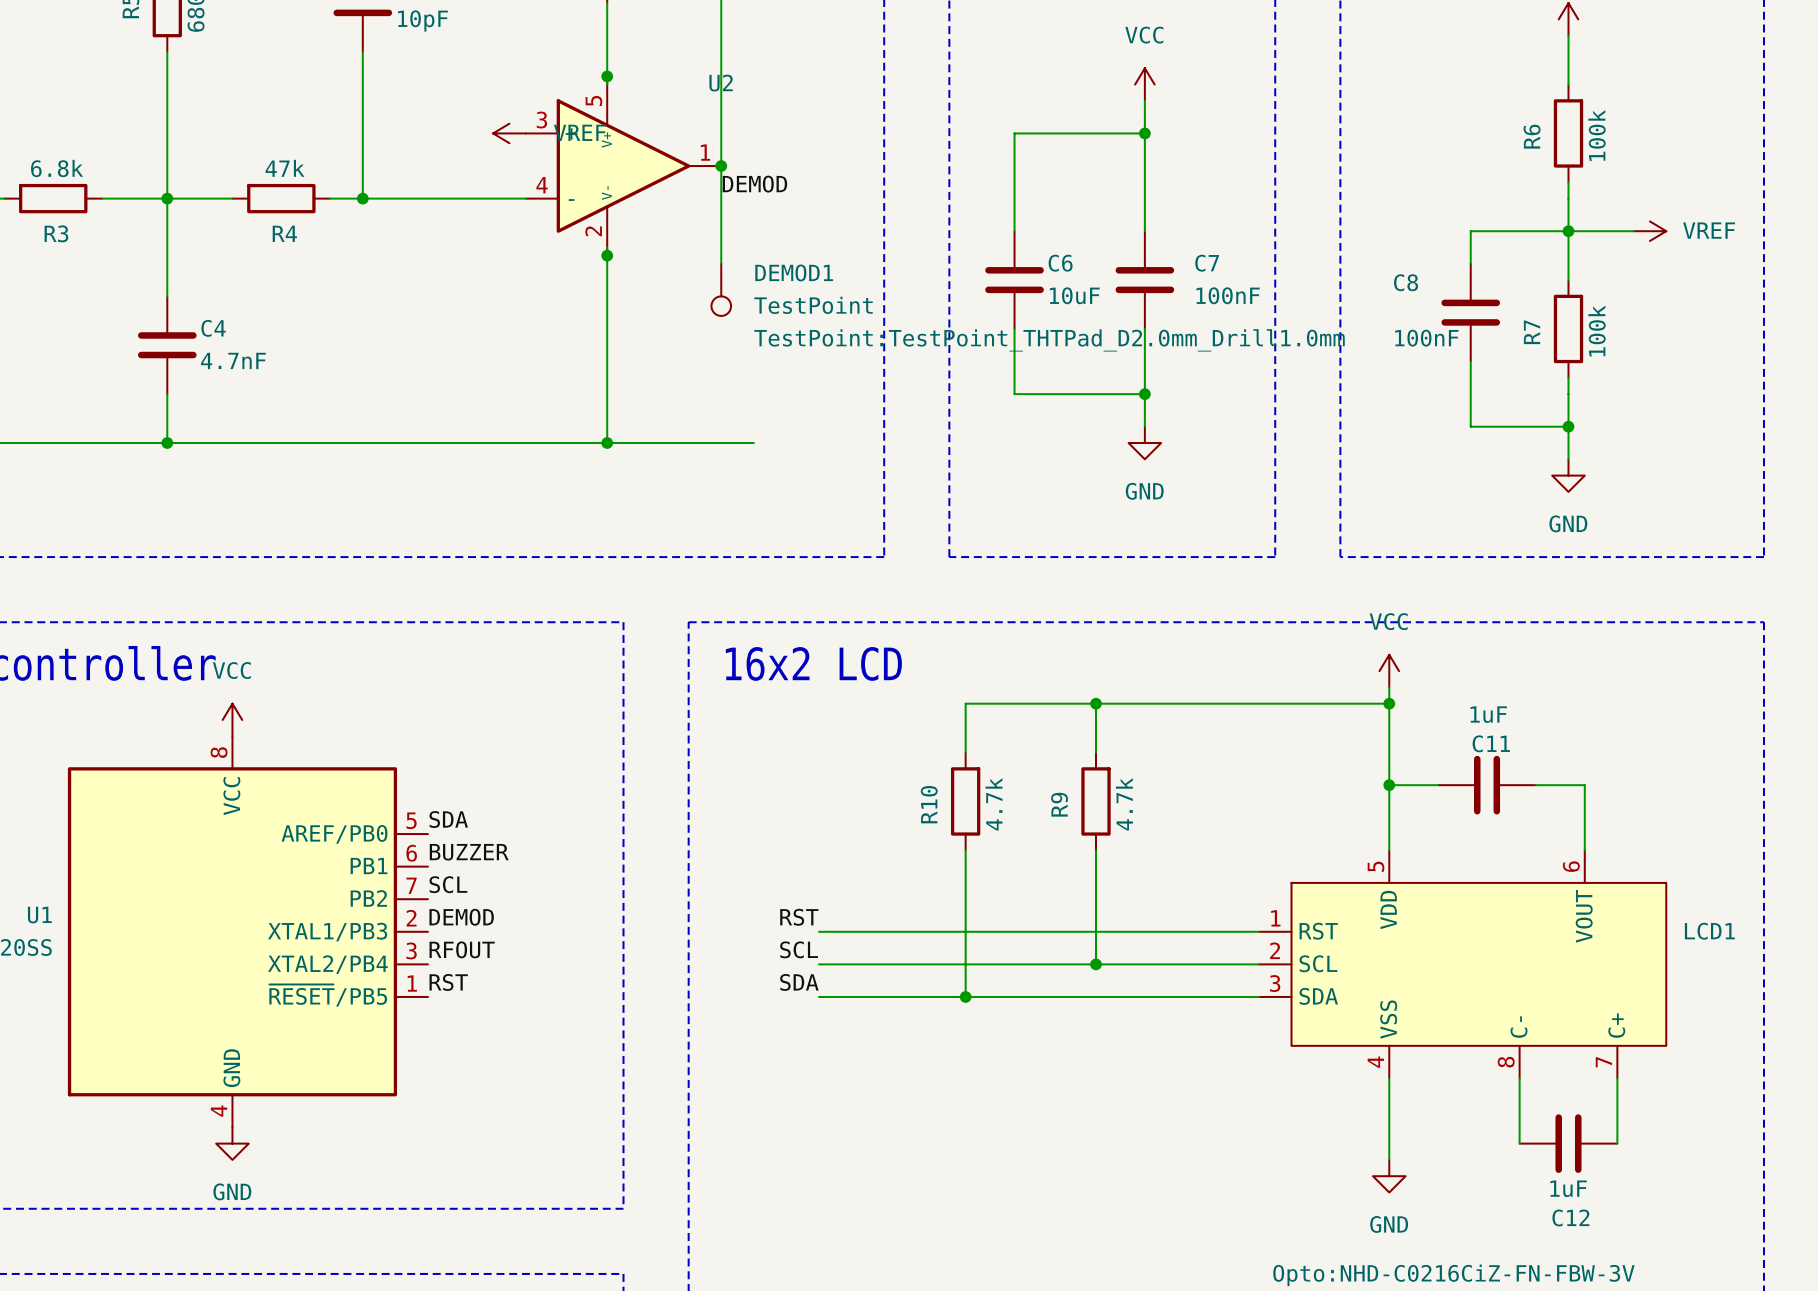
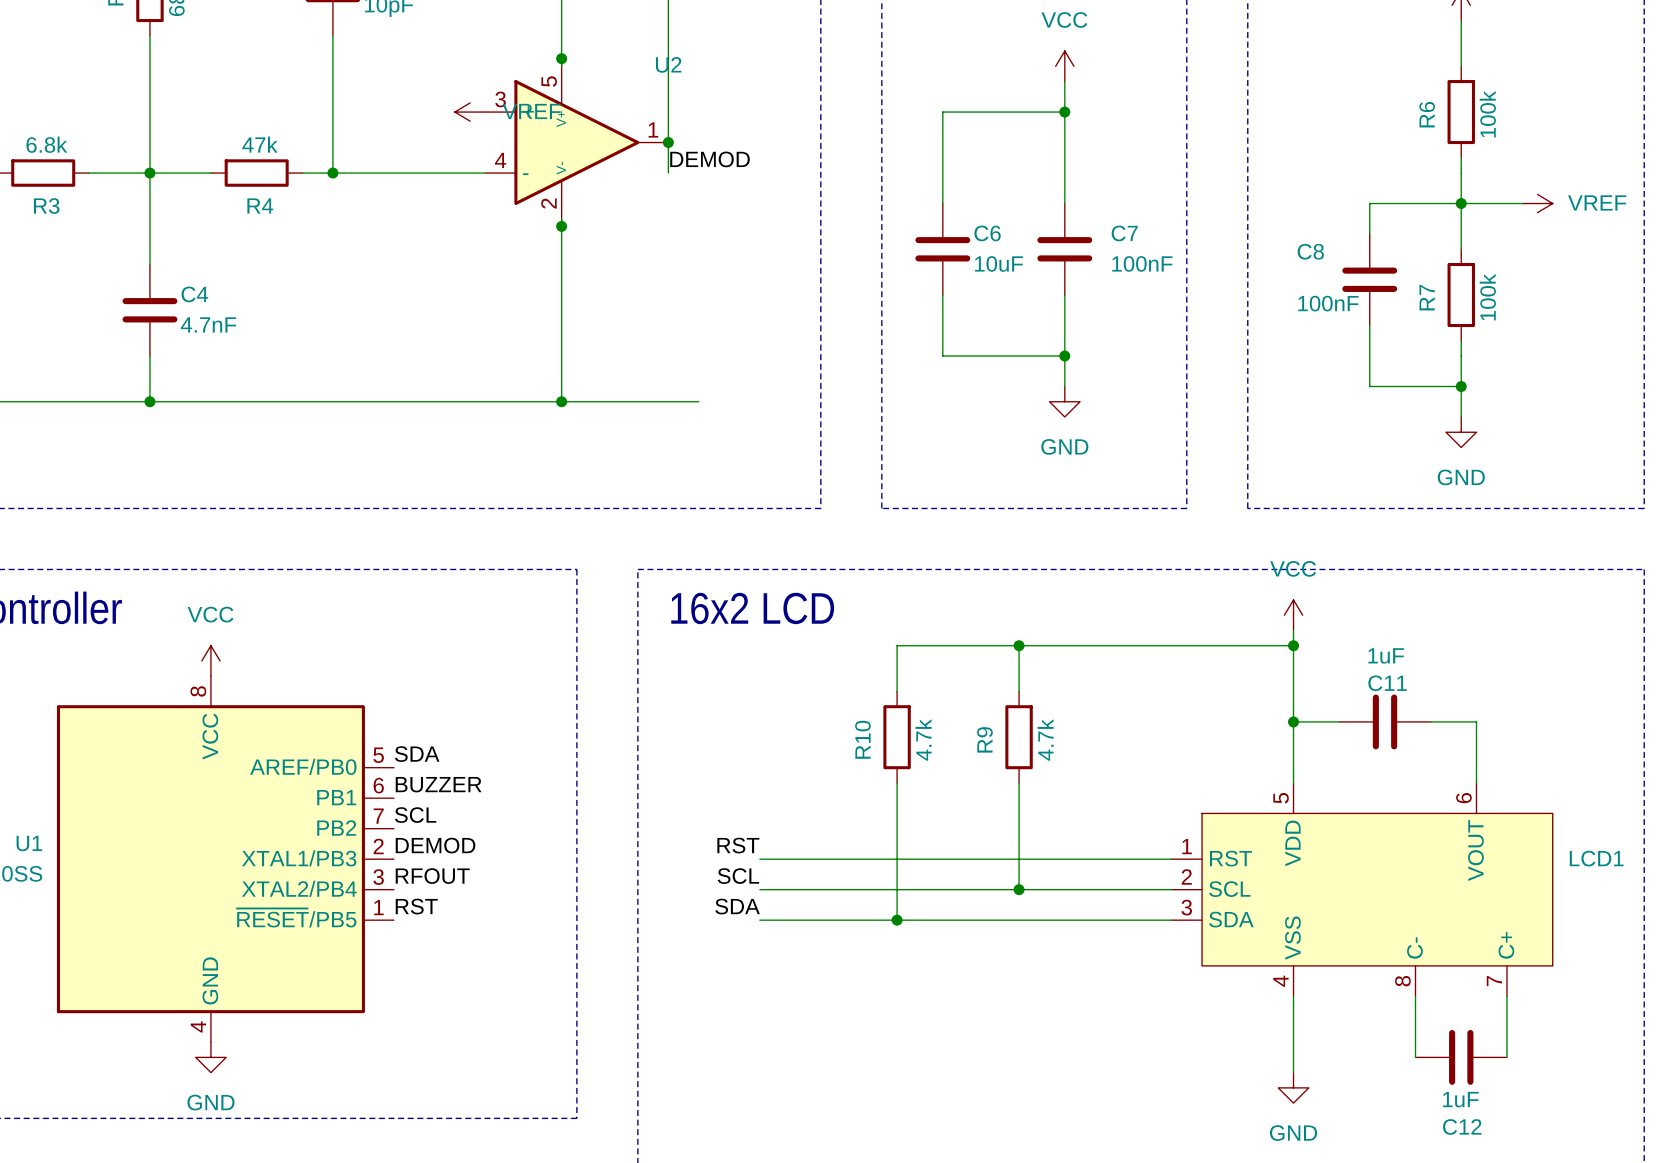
wire: (721, 198) (721, 263) -> none
DEMOD1: TestPoint (721, 289) -> none

